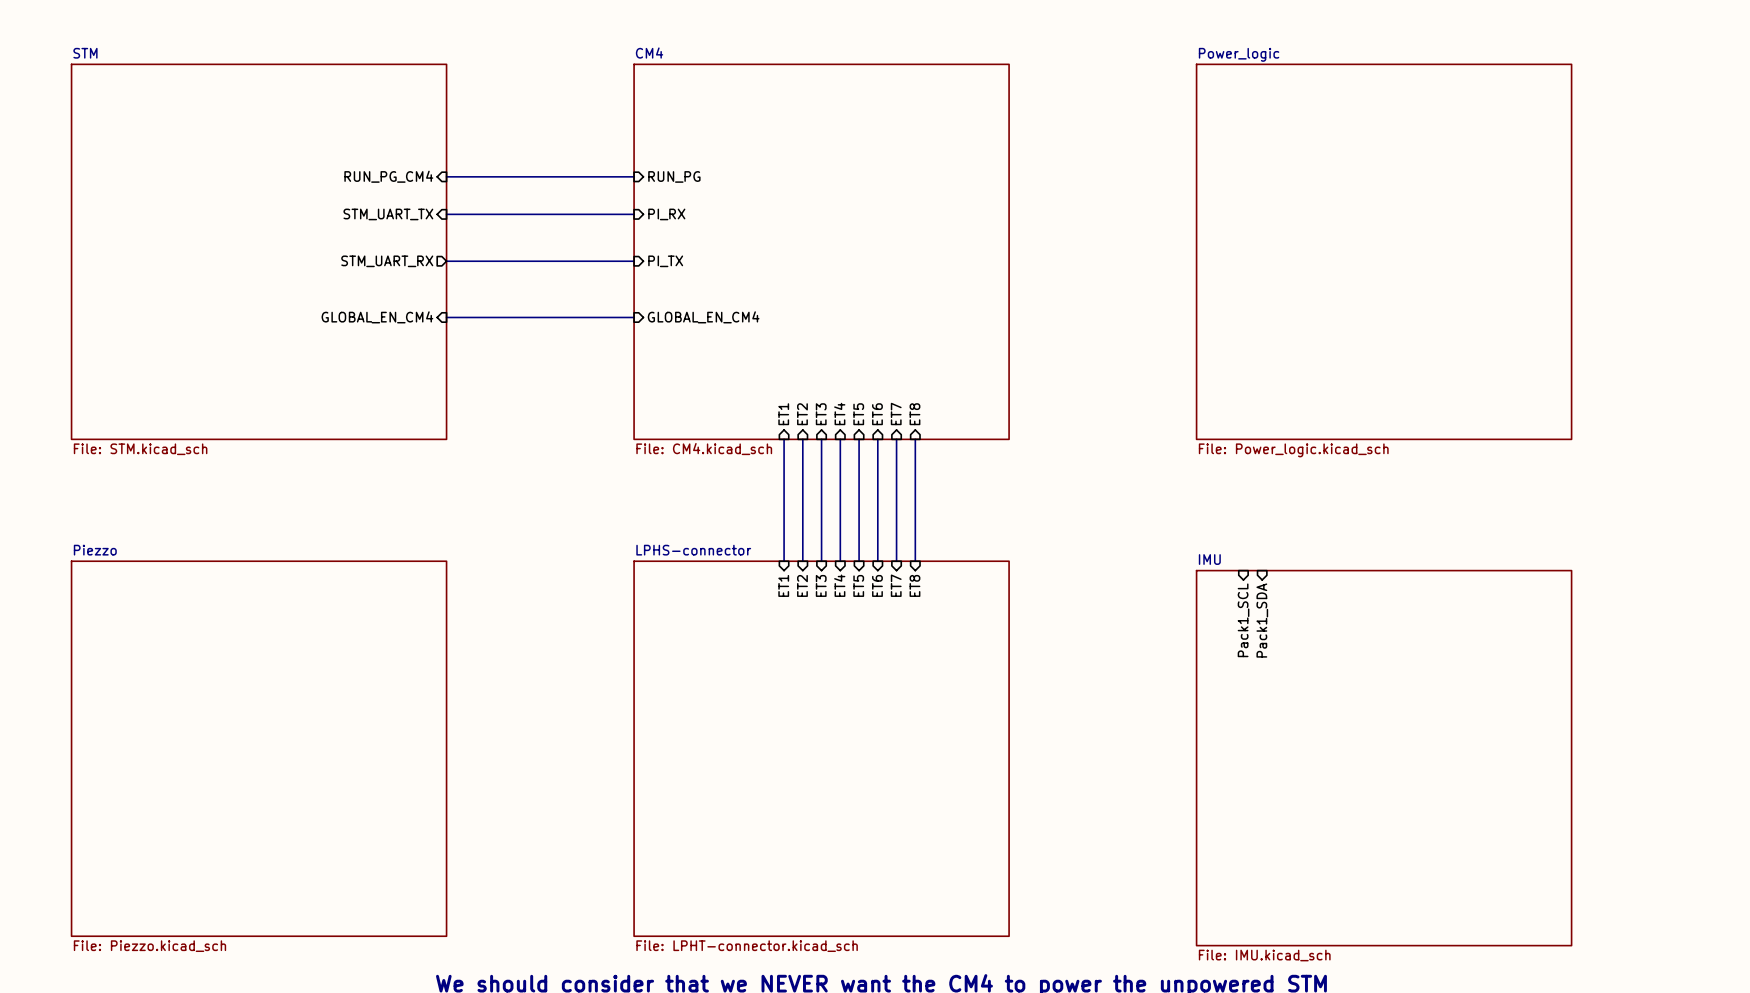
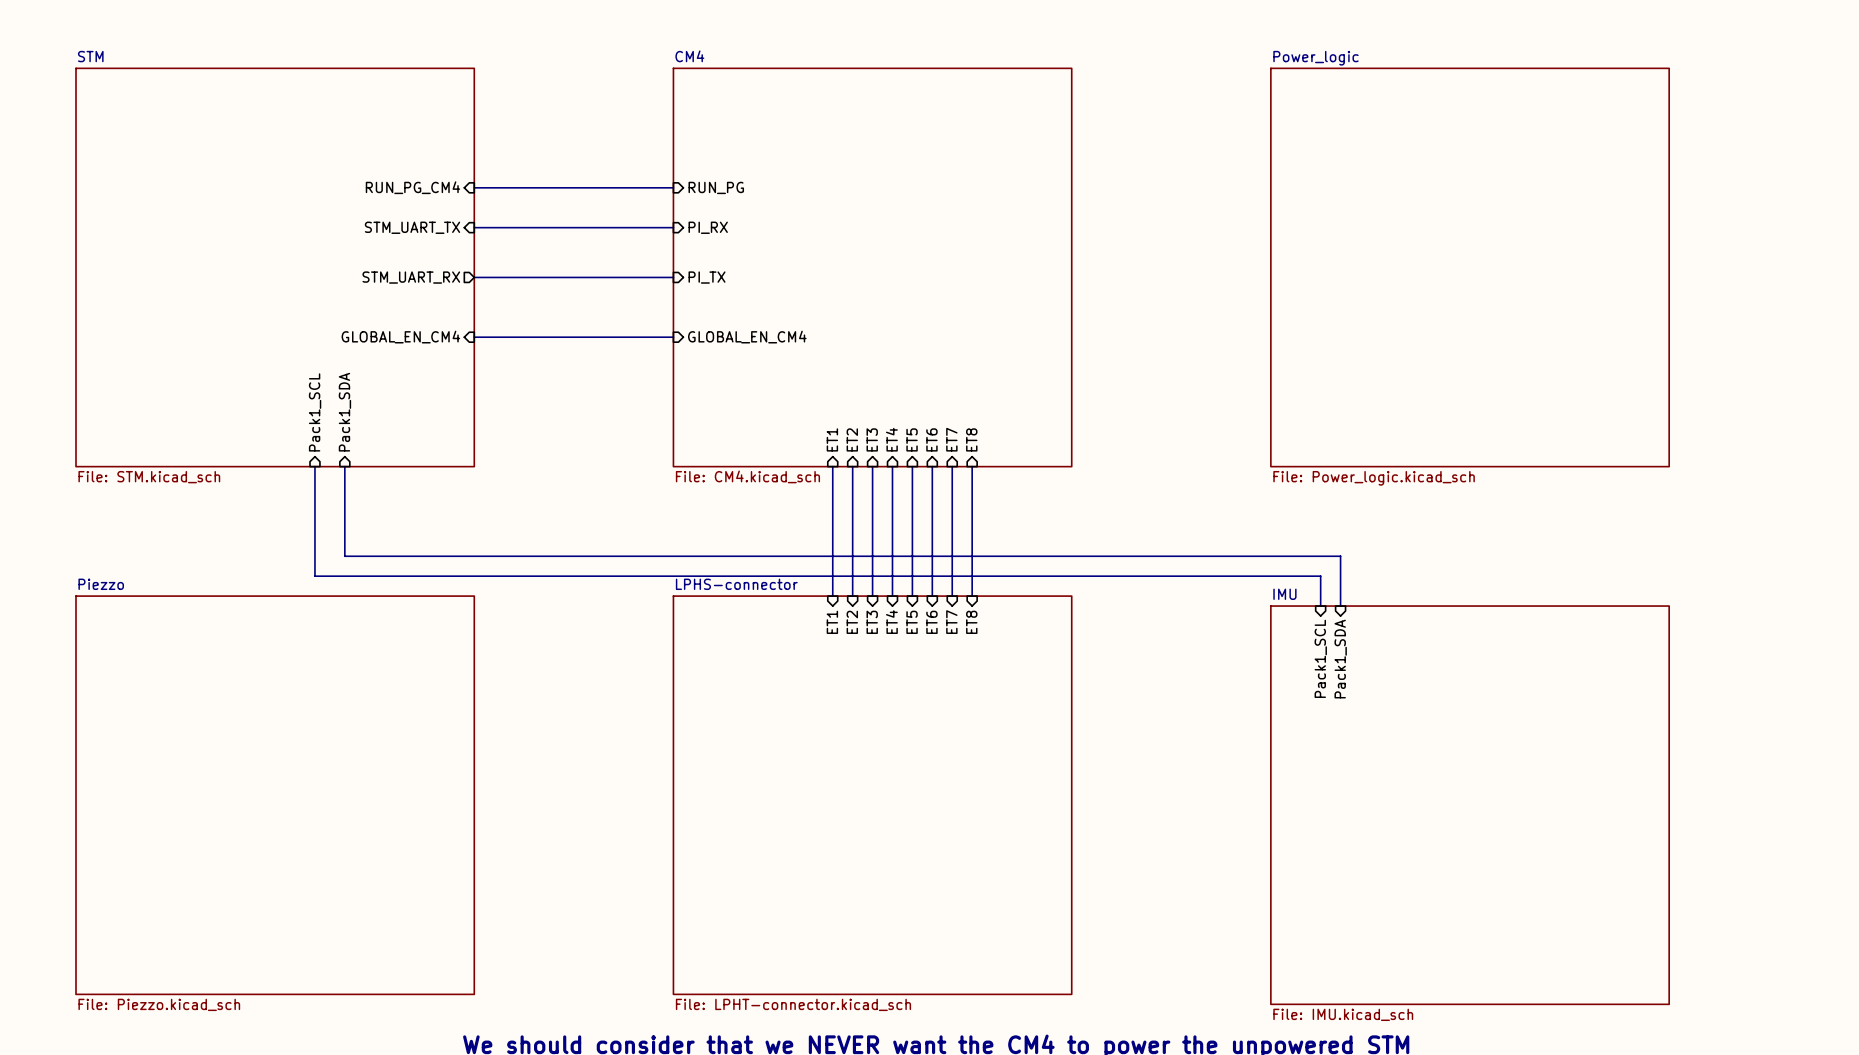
sheet pin: none -> Pack1_SCL (315, 412)
sheet pin: none -> Pack1_SDA (344, 412)
wire: none -> (314, 466) (314, 576) (1320, 576) (1320, 606)
wire: none -> (344, 466) (344, 556) (1340, 556) (1340, 606)

